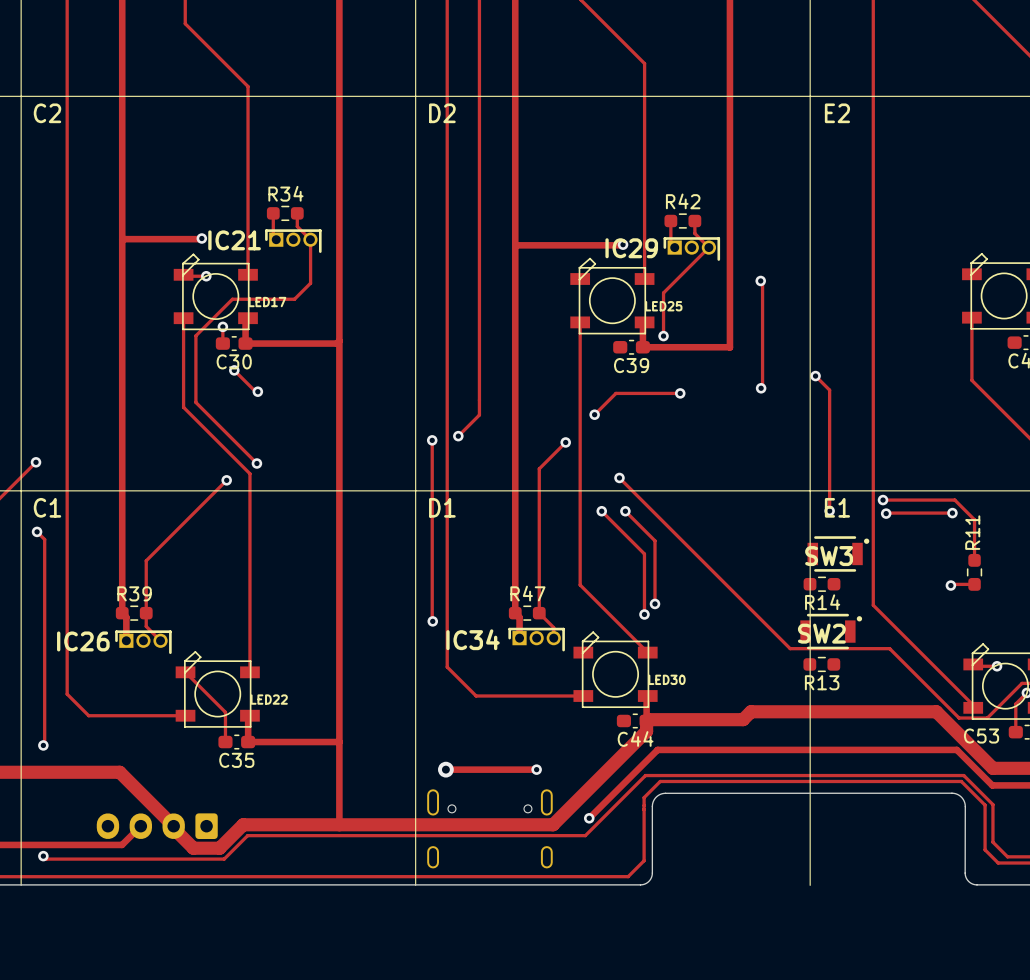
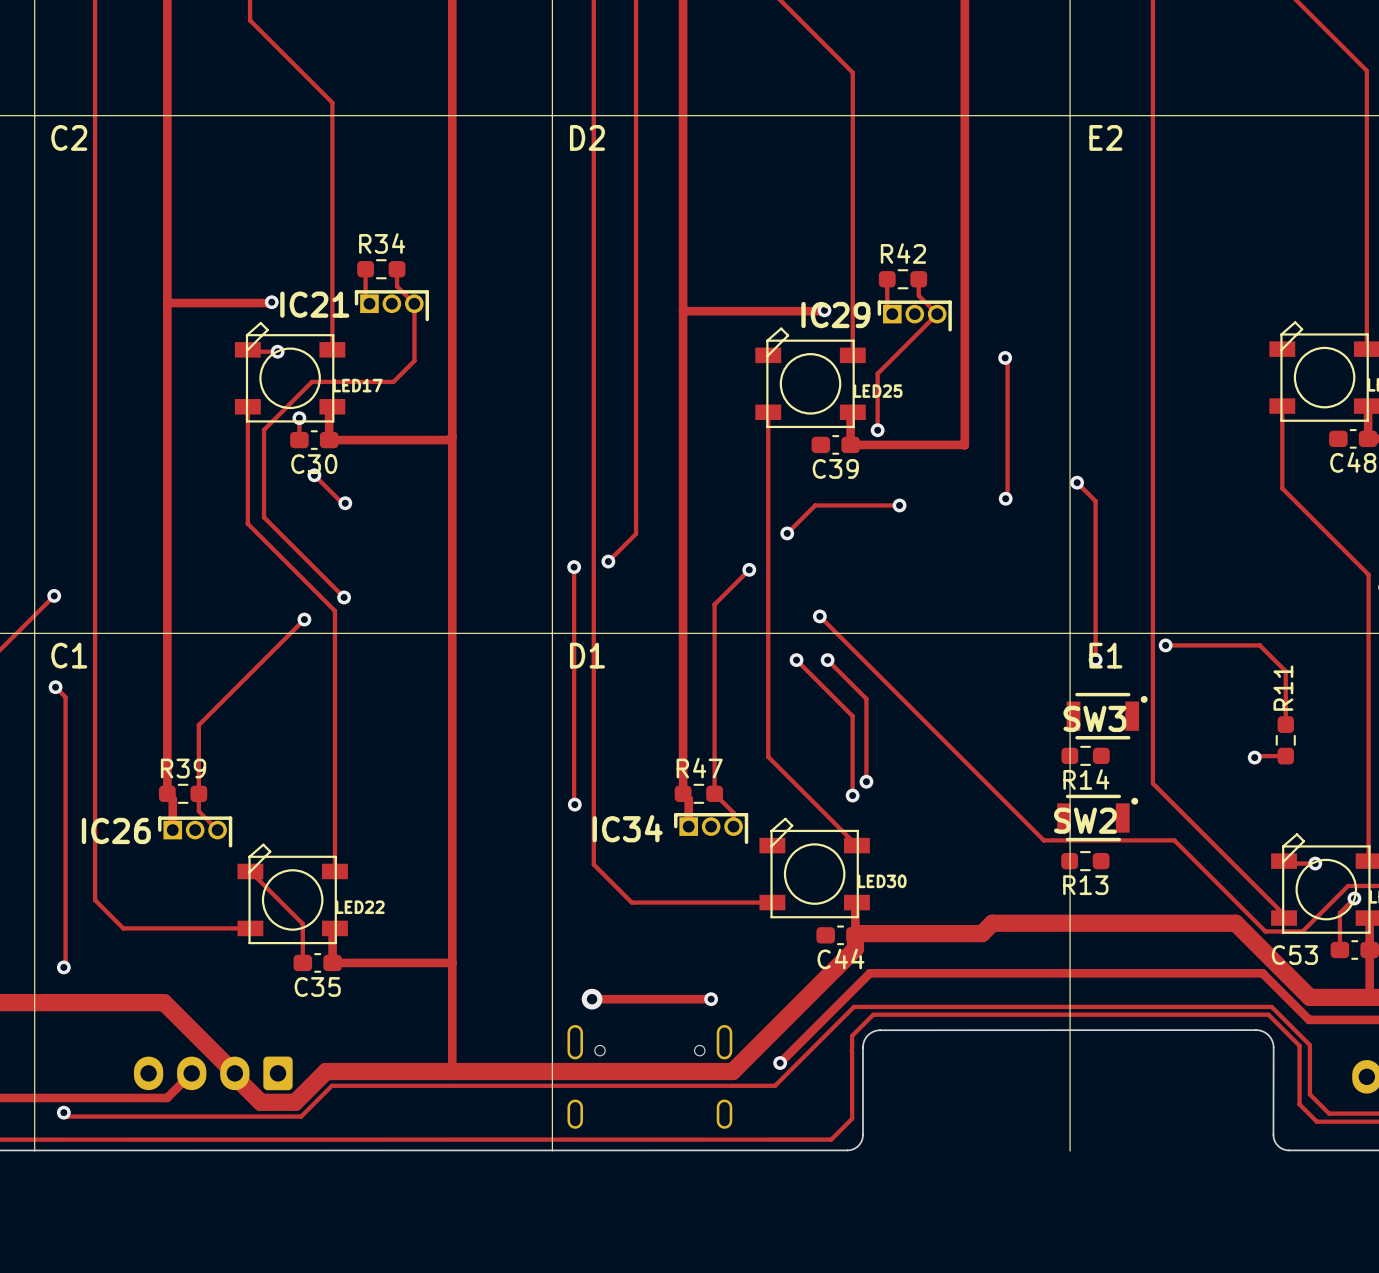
via: (886, 513) -> none
track: (952, 513) (886, 513) -> none
via: (952, 513) -> none

